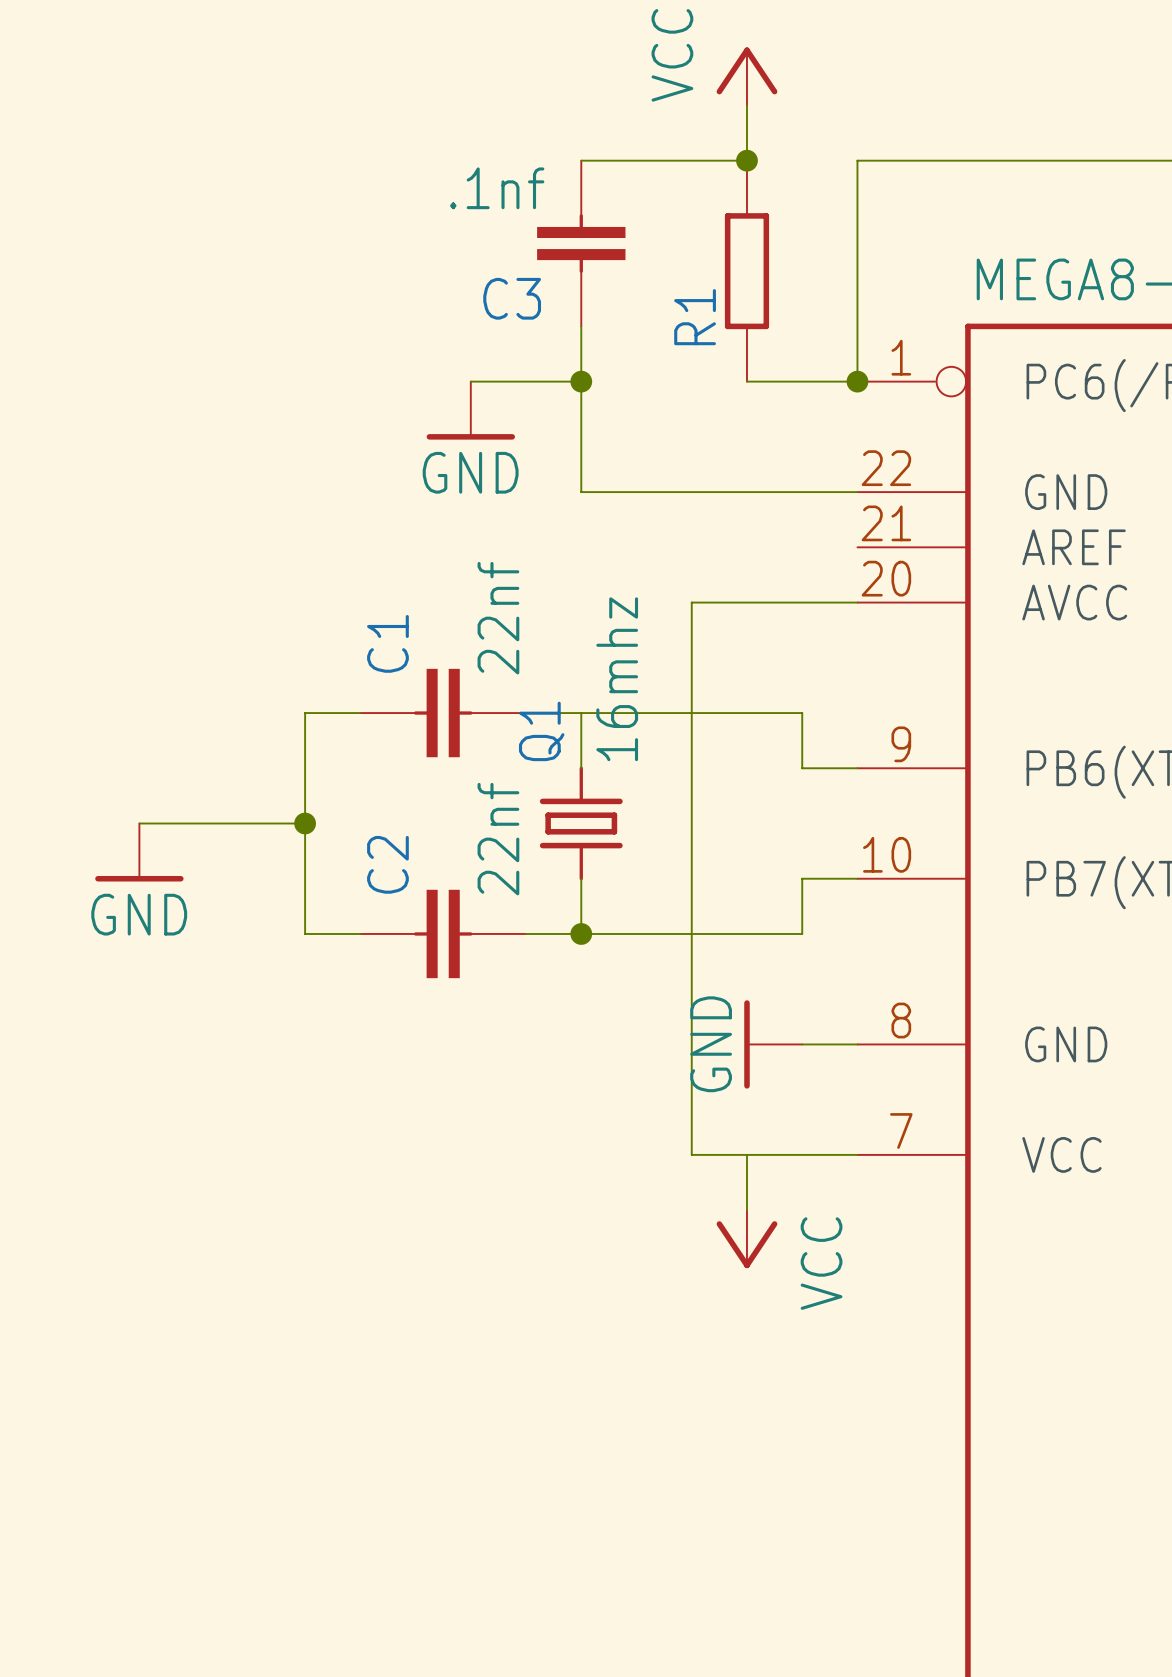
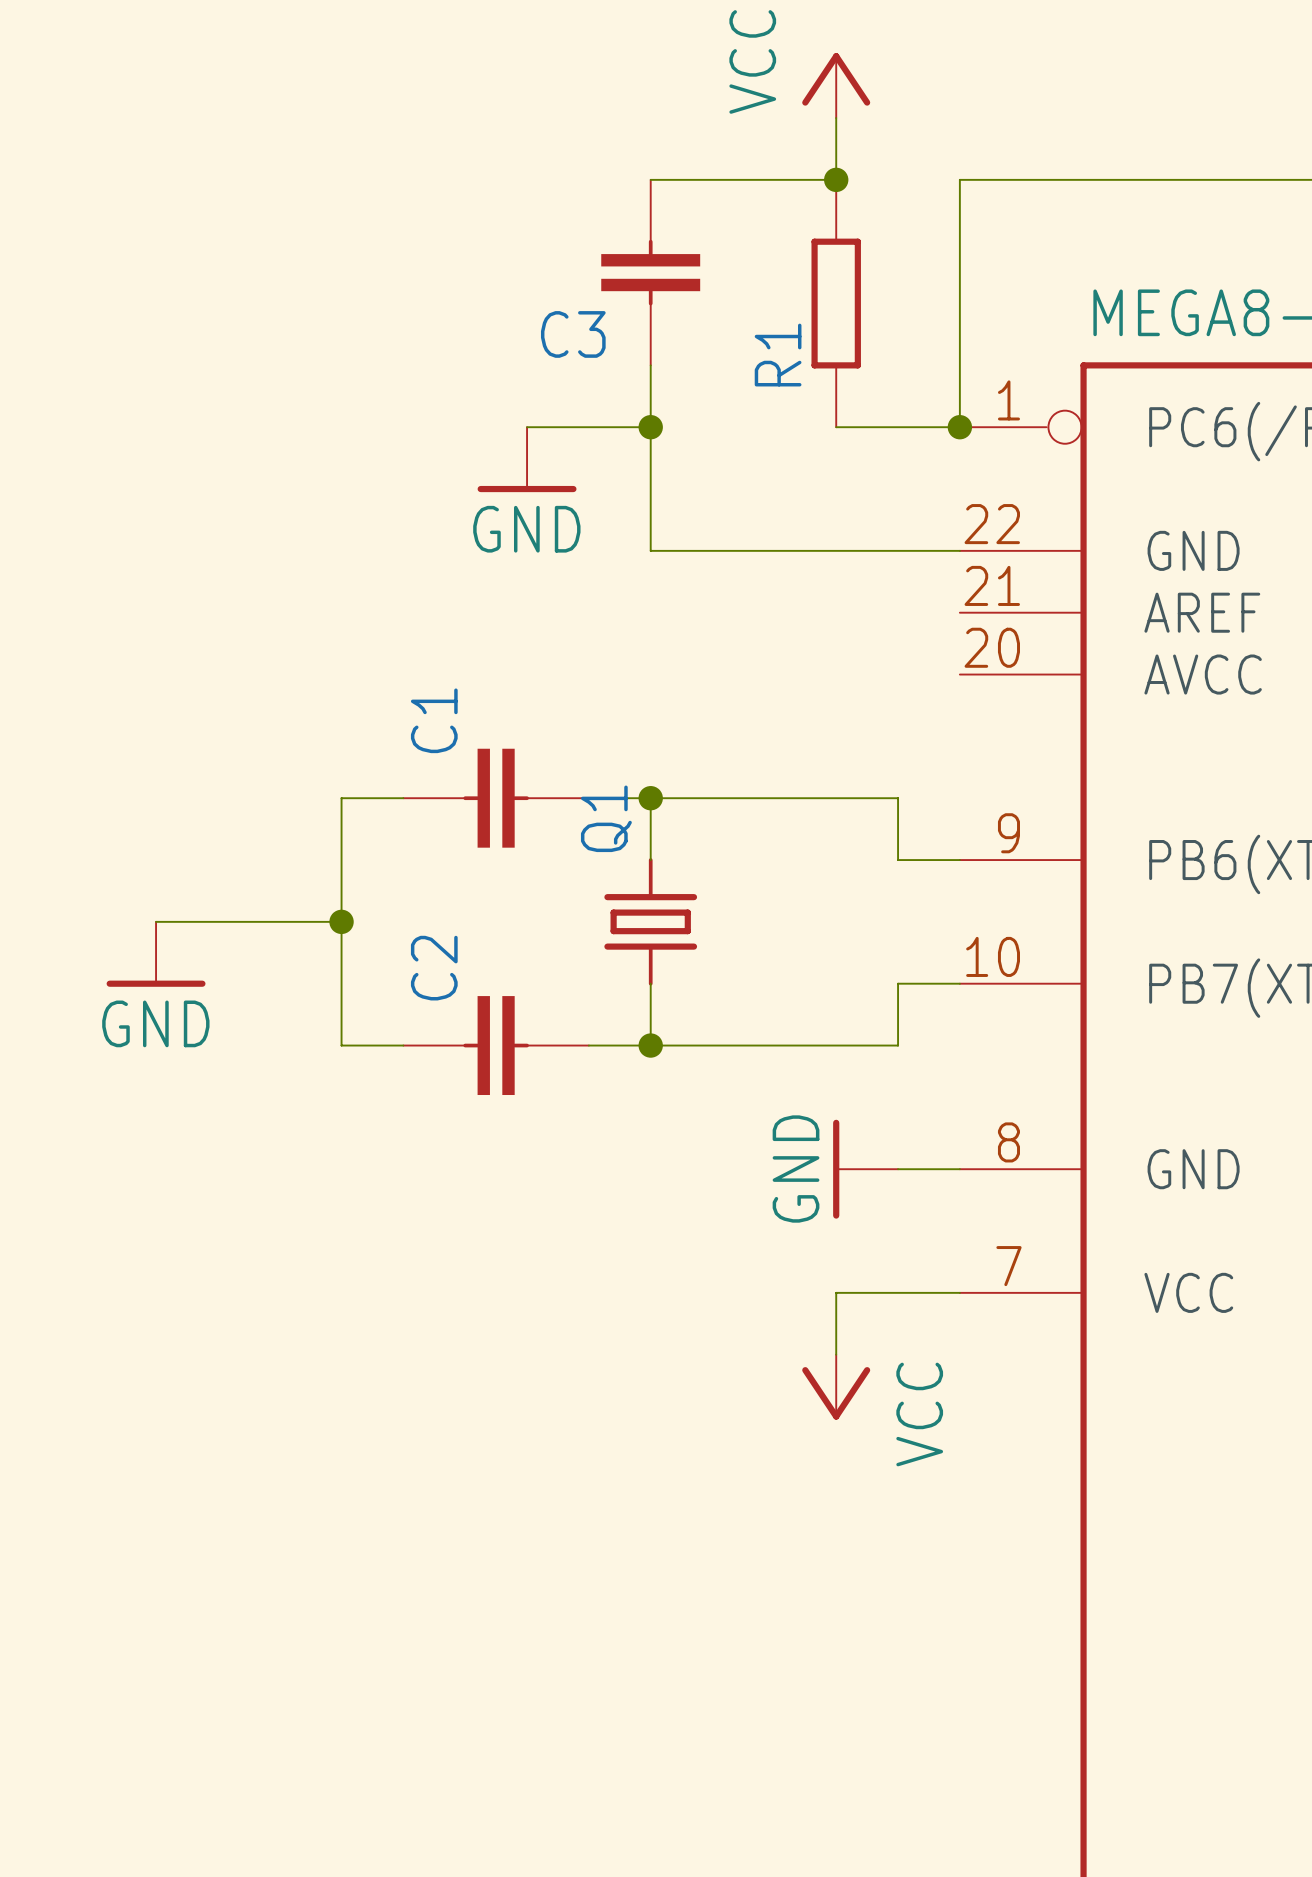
C3 value: .1nf (497, 188) -> none
wire: (857, 602) (691, 602) (691, 1154) (746, 1154) -> none
C1 value: 22nf (498, 618) -> none
Q1 value: 16mhz (617, 679) -> none
junction: none -> (650, 798)
C2 value: 22nf (498, 839) -> none

